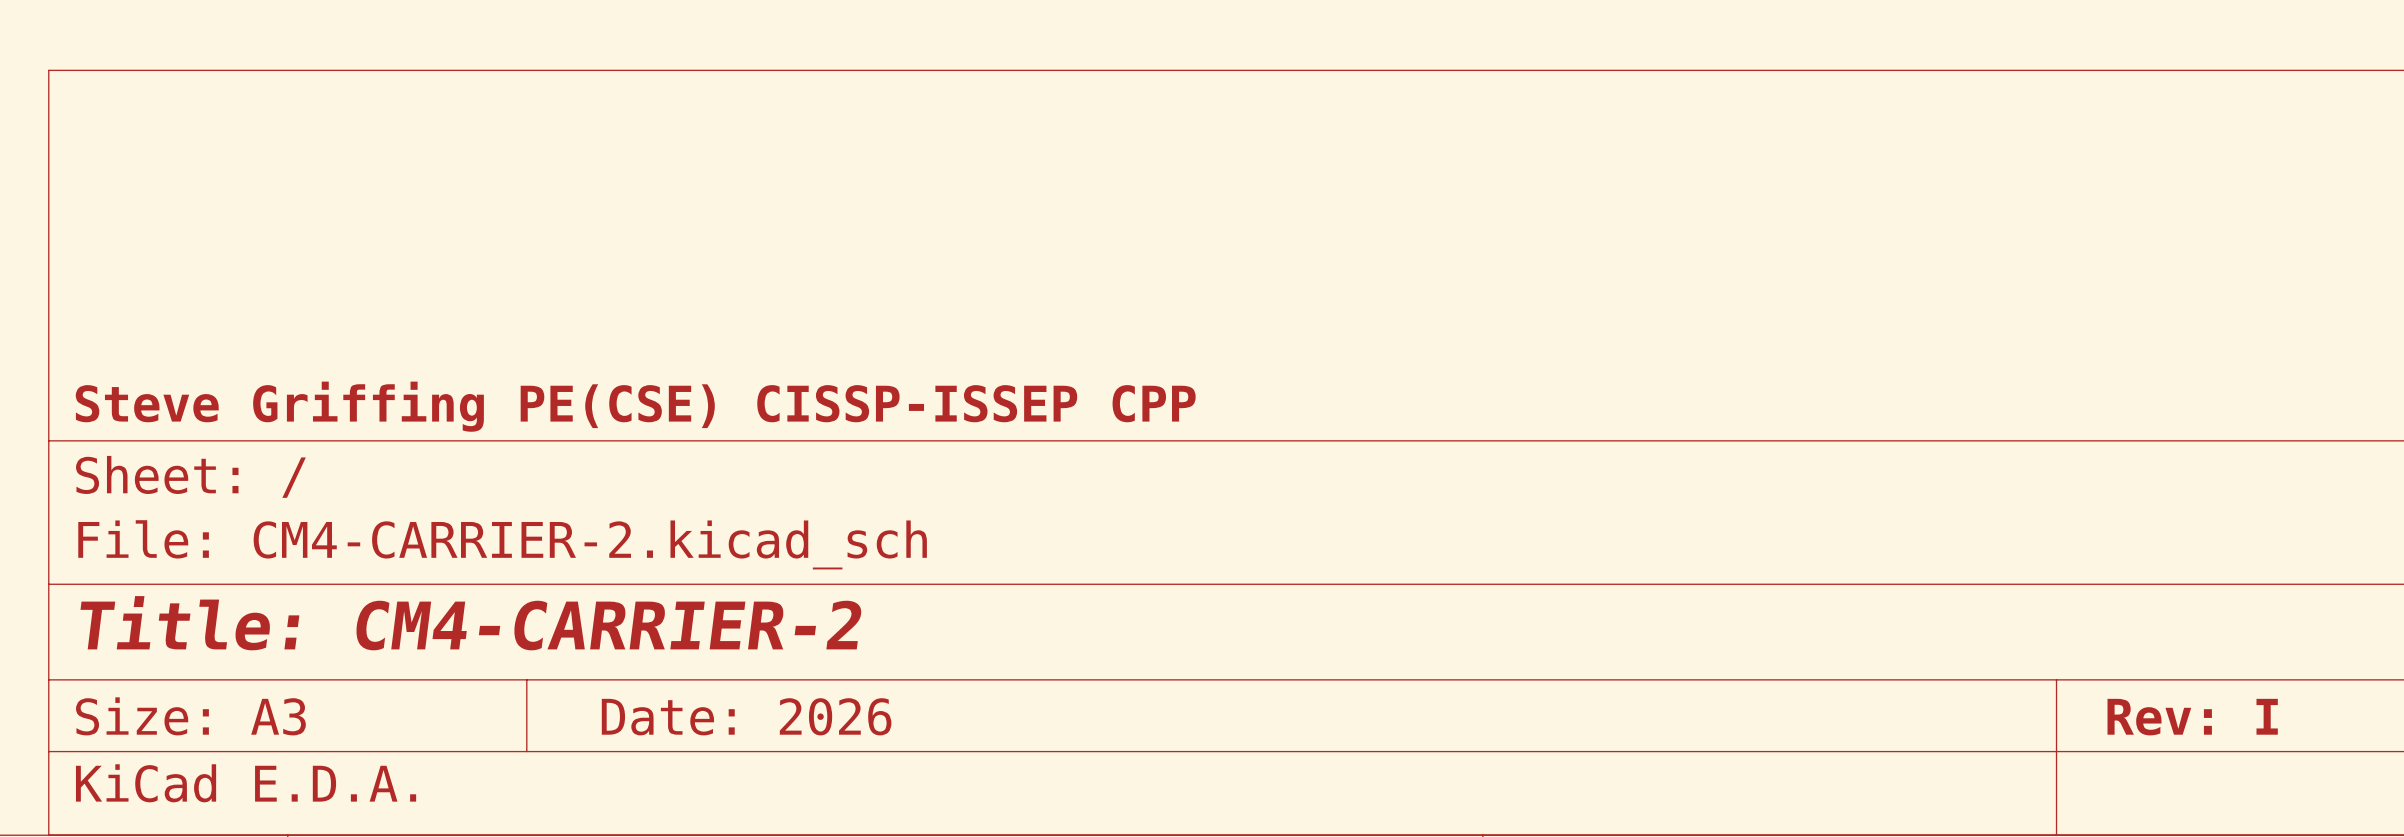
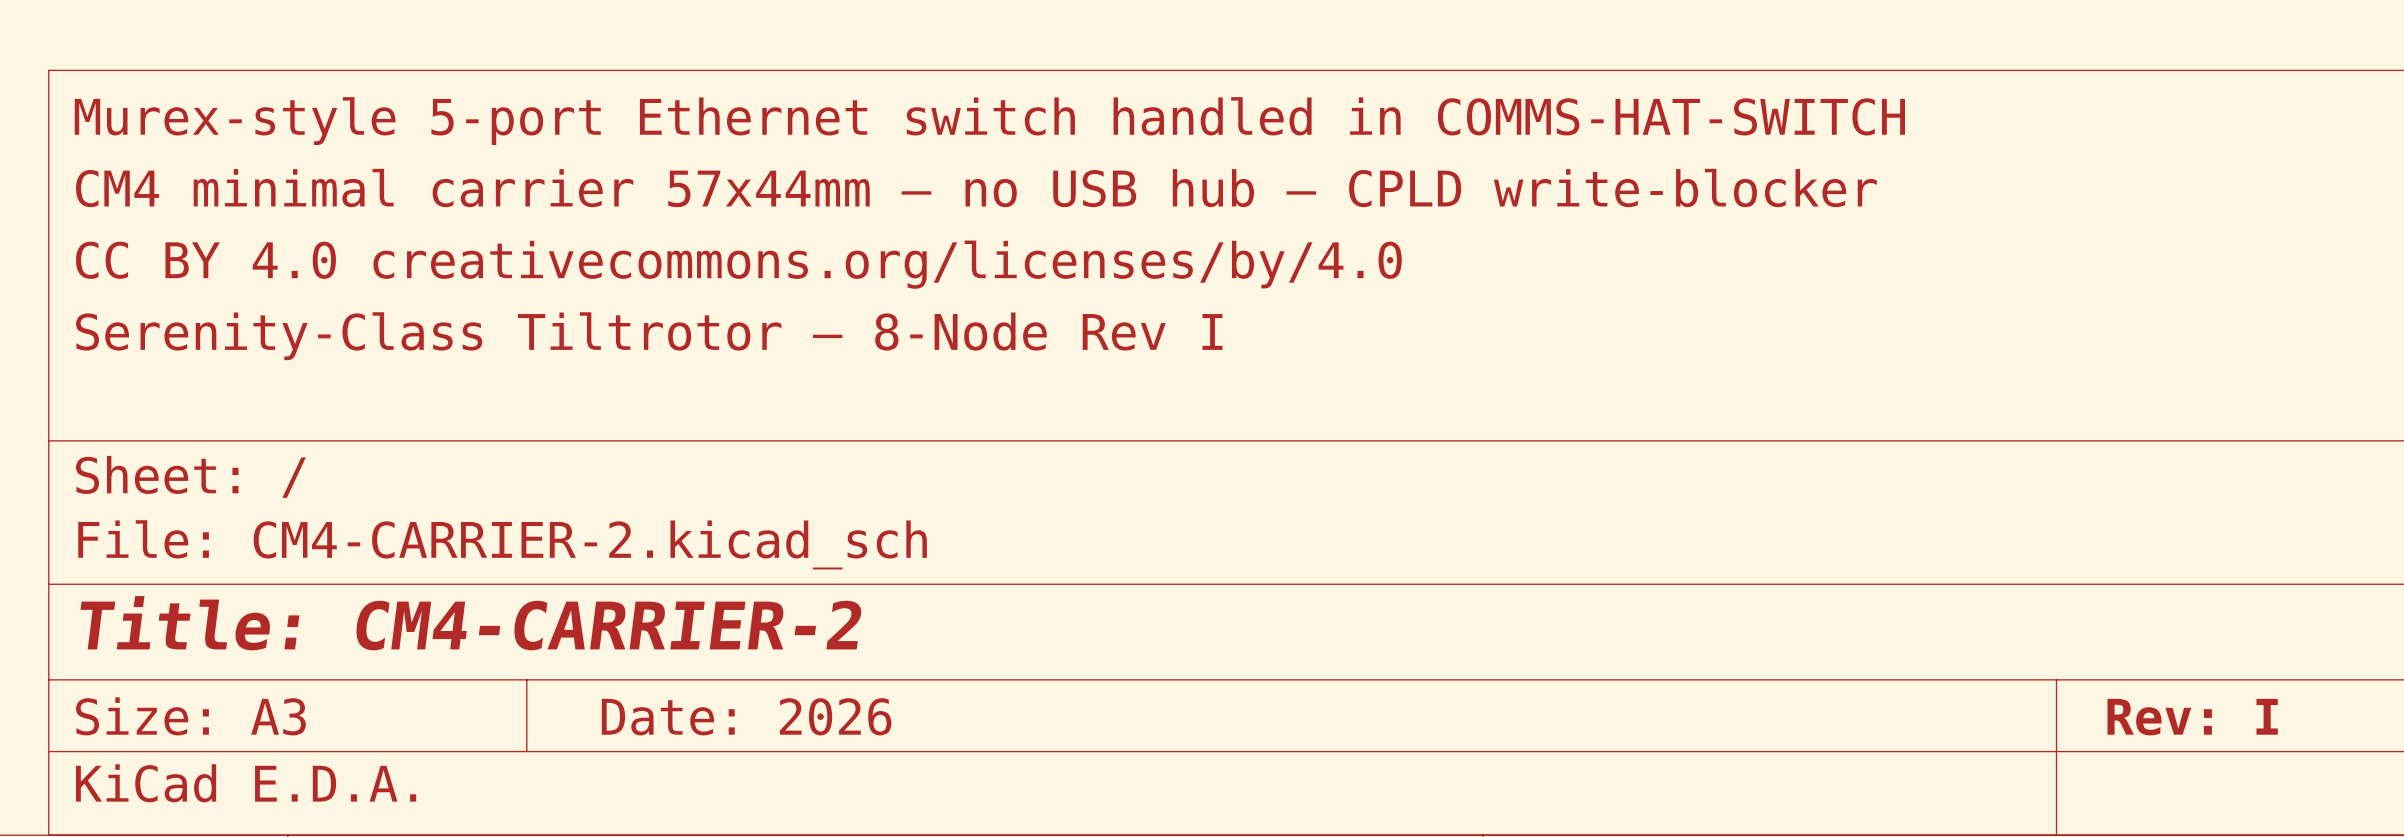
title block: none -> Murex-style 5-port Ethernet switch handled in COMMS-HAT-SWITCH (989, 121)
title block: none -> CM4 minimal carrier 57x44mm — no USB hub — CPLD write-blocker (976, 188)
title block: none -> CC BY 4.0 creativecommons.org/licenses/by/4.0 (738, 264)
title block: none -> Serenity-Class Tiltrotor — 8-Node Rev I (649, 336)
title block: Steve Griffing PE(CSE) CISSP-ISSEP CPP (635, 406) -> none

